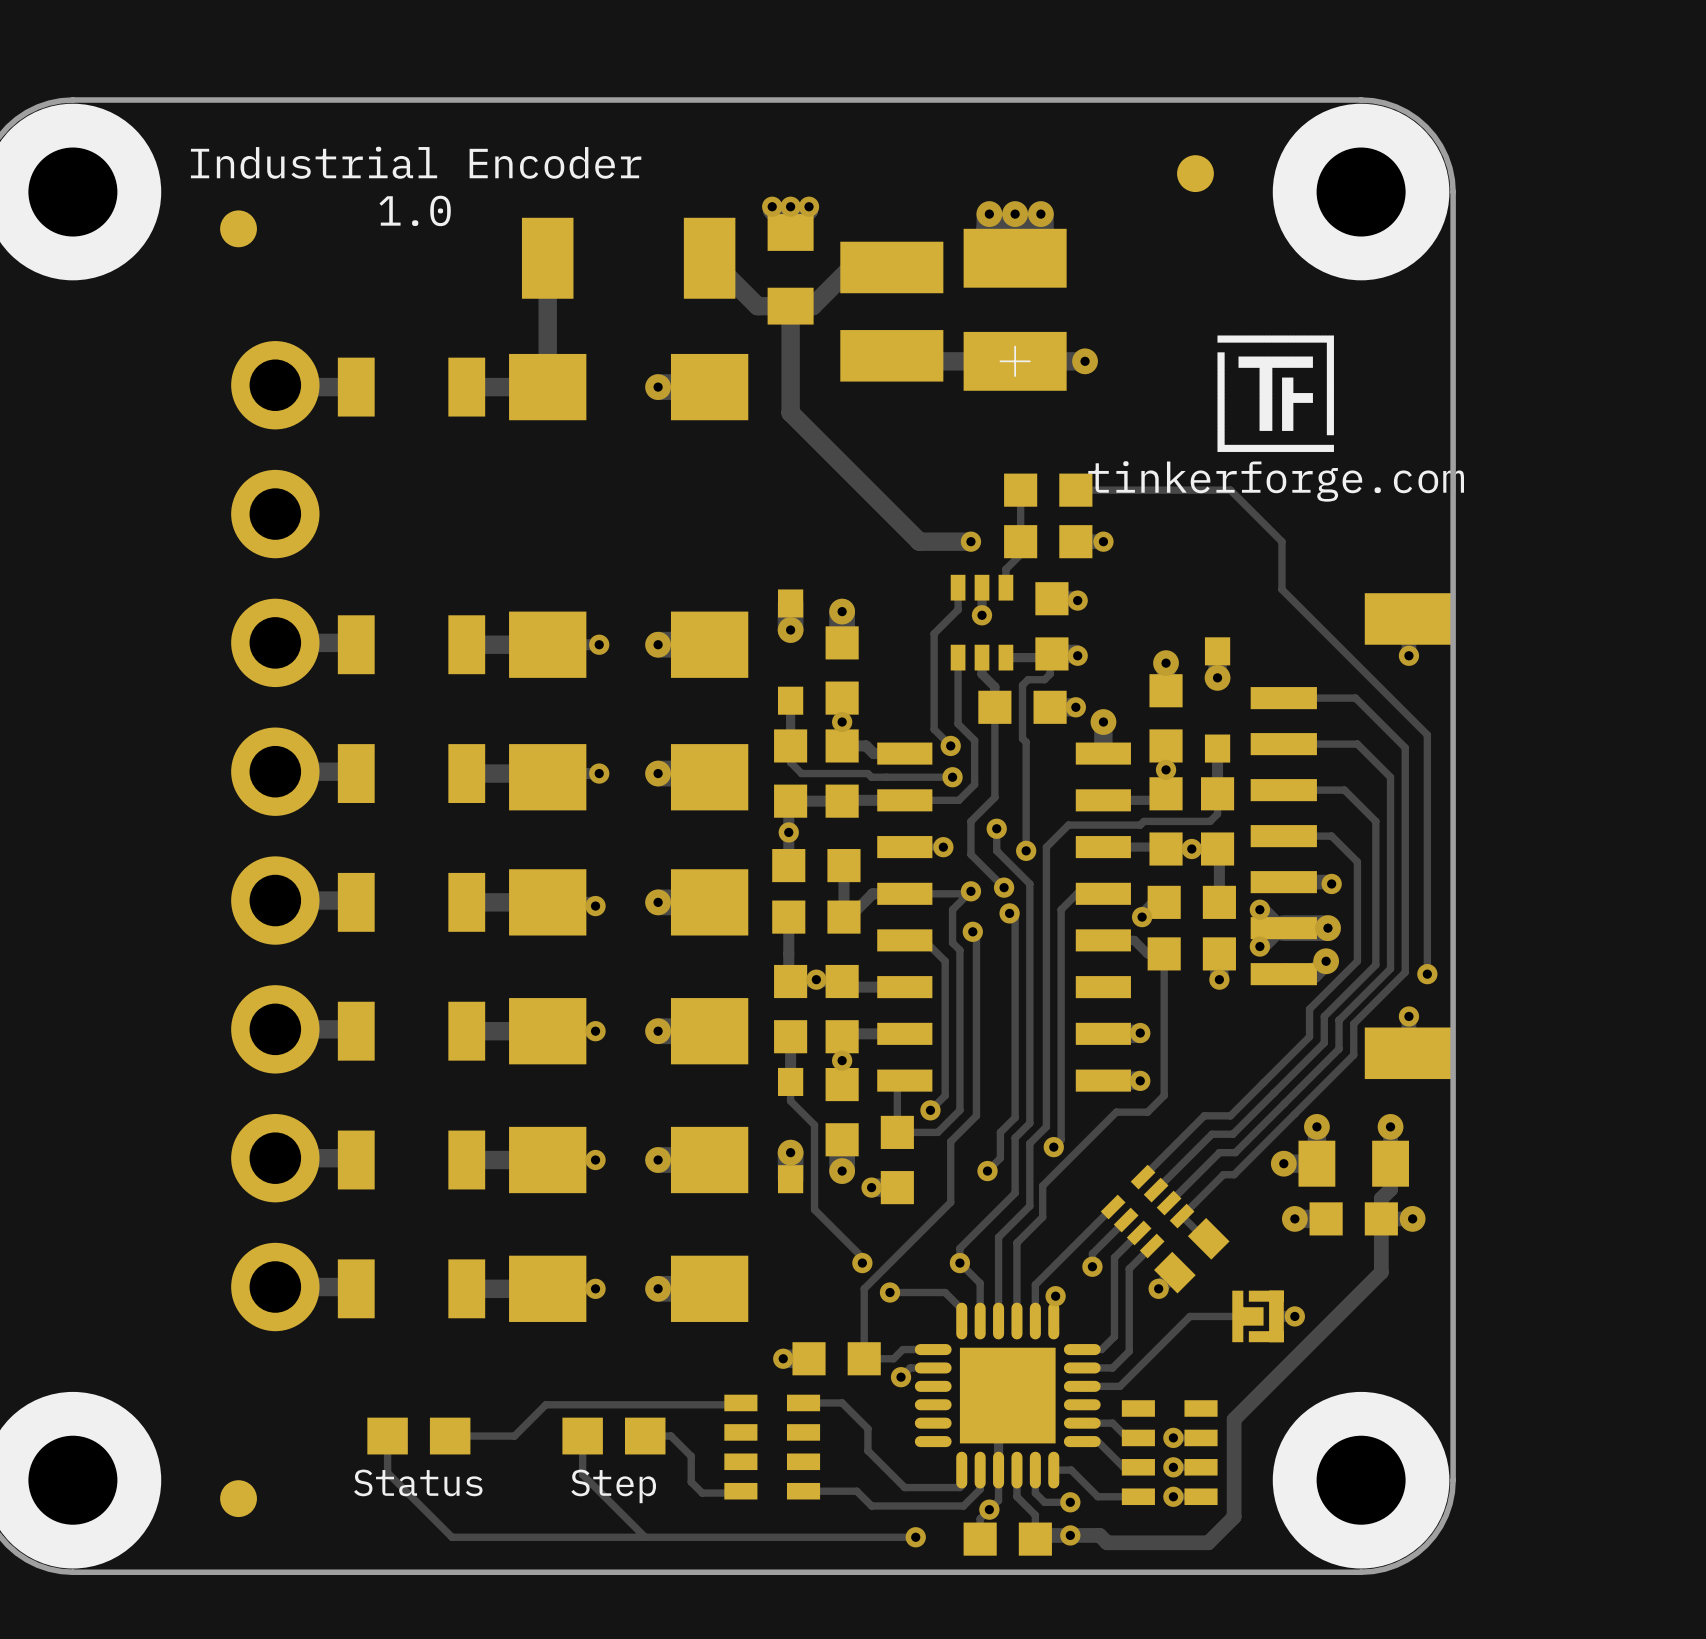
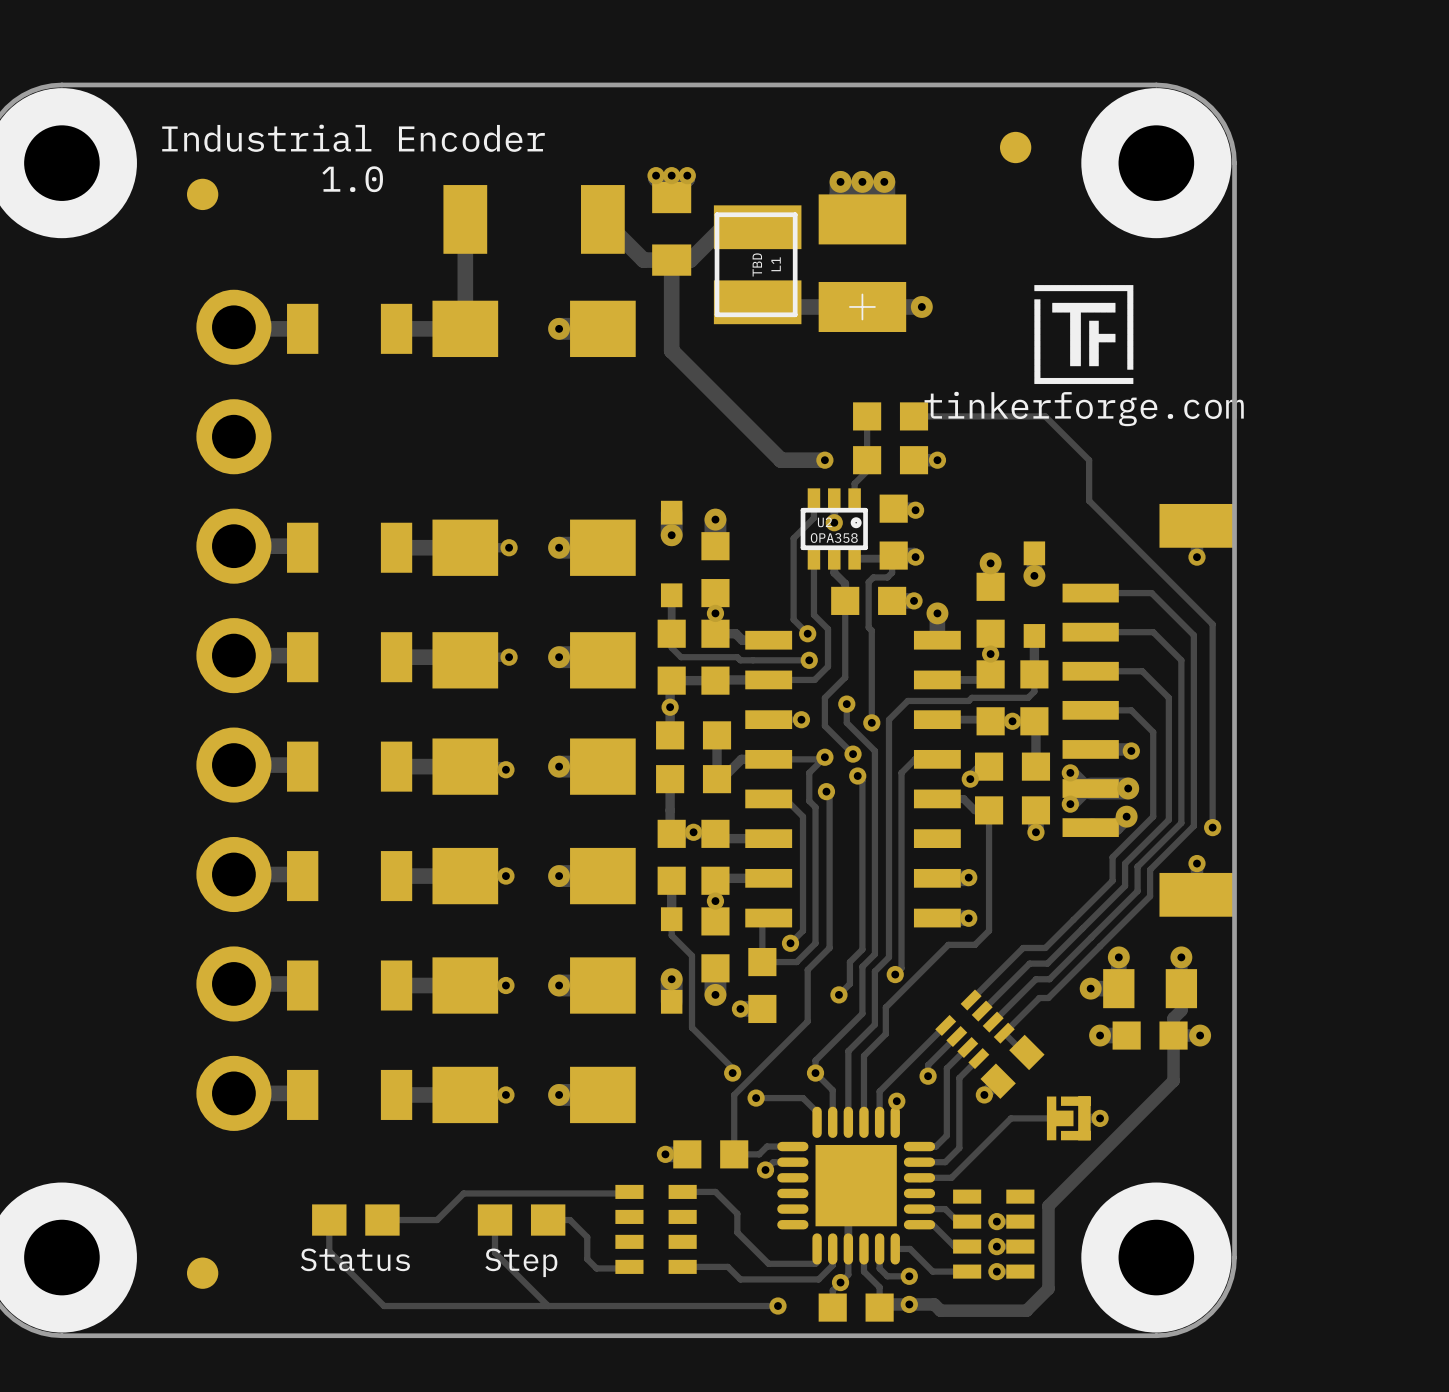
part: (891, 311) -> none
L1: none -> TBD (757, 264)
part: (982, 622) -> none
U2: none -> OPA358 (834, 528)

